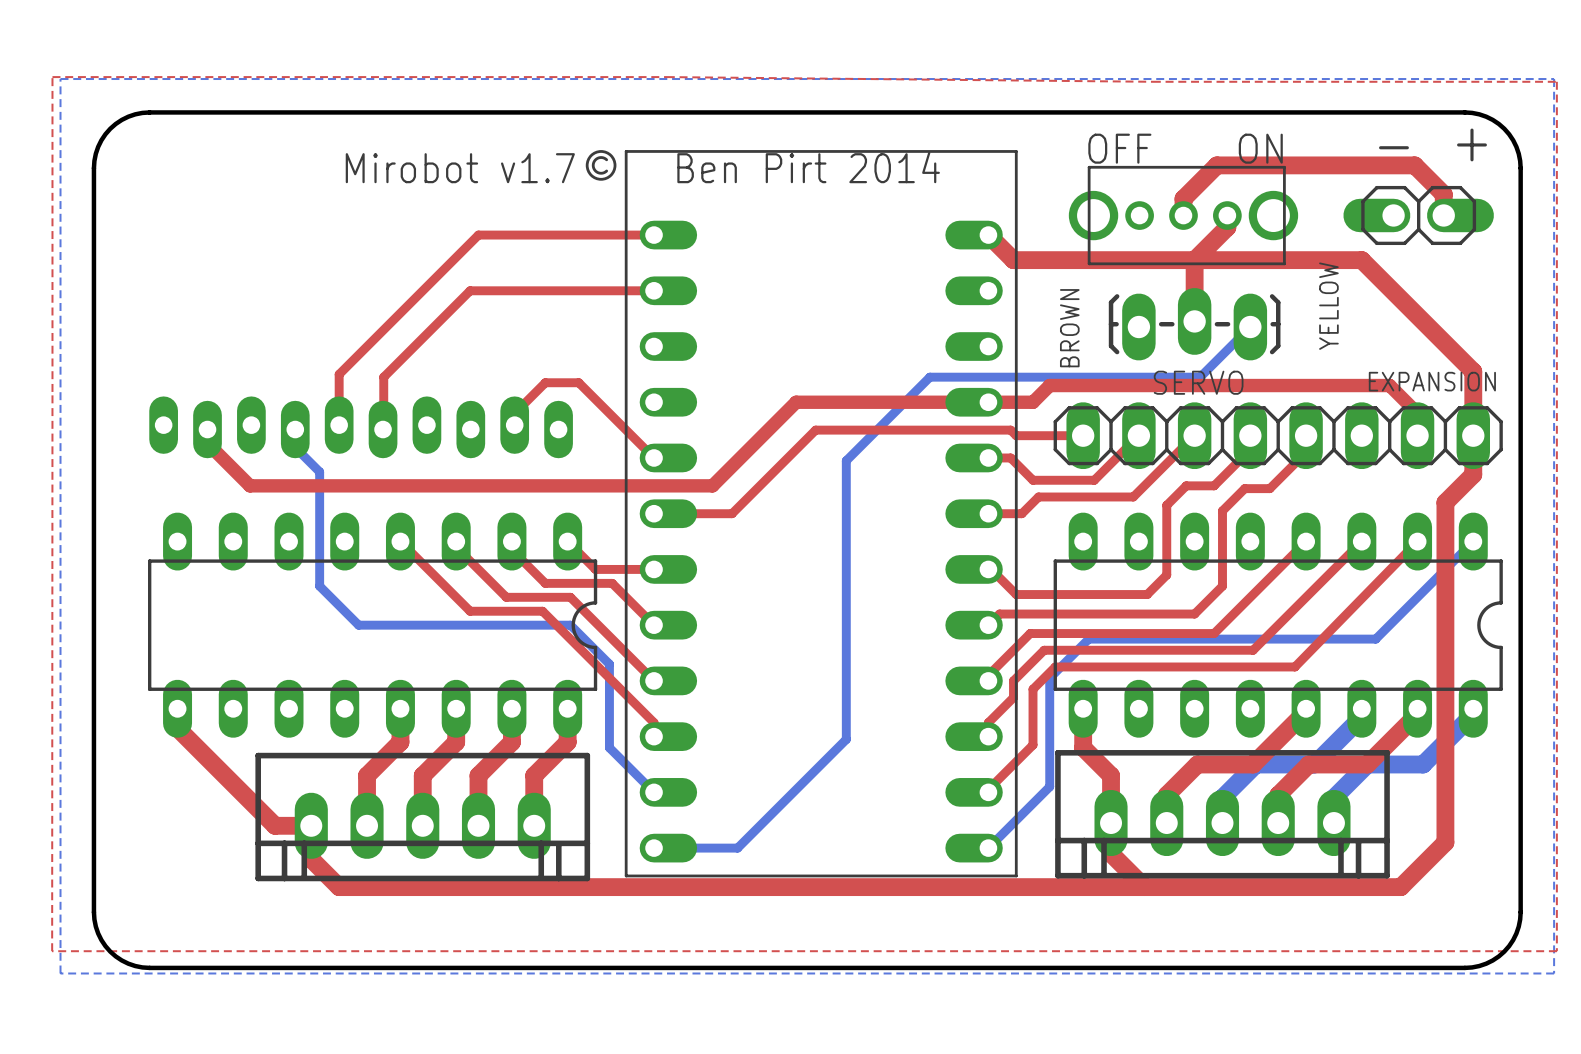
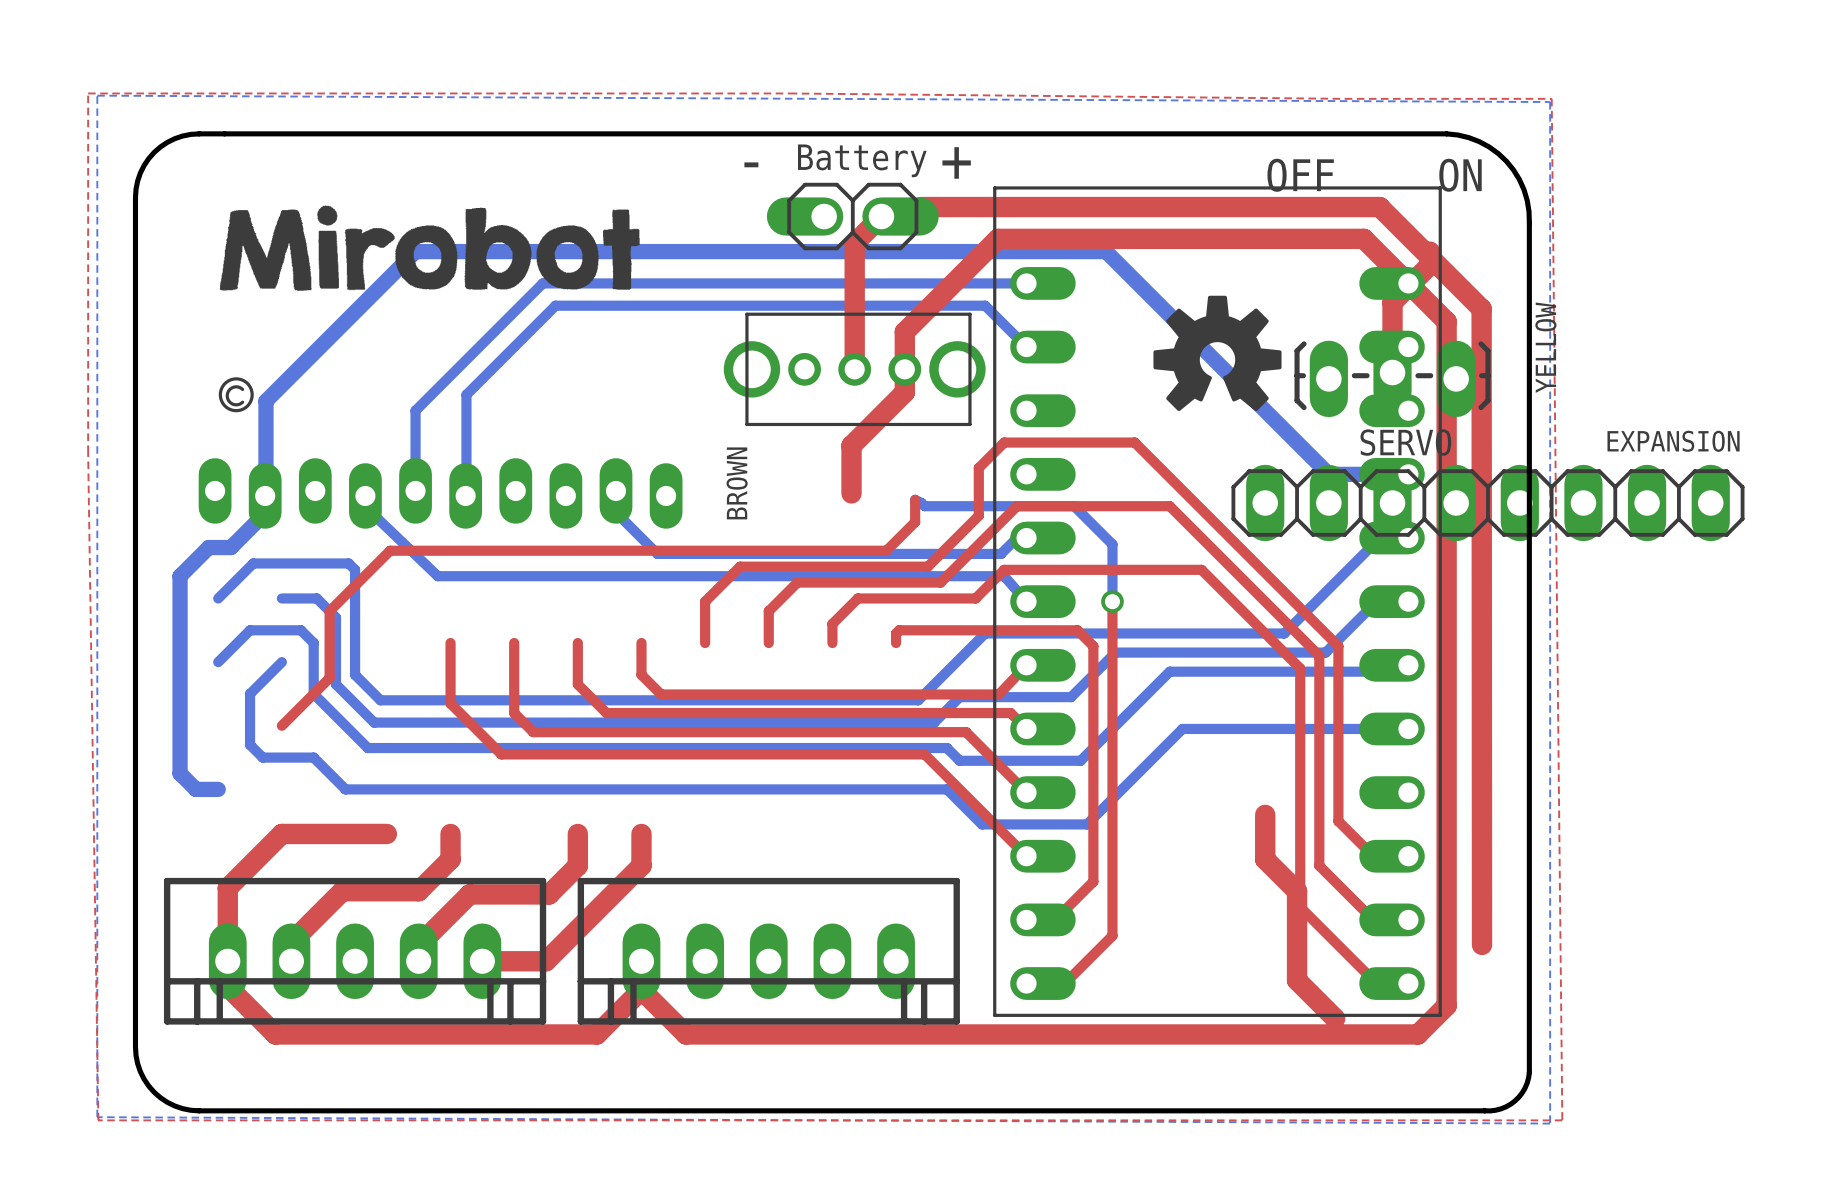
bottom zone outline: (60, 79) (1554, 79) (1554, 973) (60, 973) -> (97, 95) (1550, 102) (1550, 1123) (97, 1117)
top zone outline: (1334, 81) (1556, 81) (1556, 951) (52, 951) (52, 391) -> (1551, 98) (1562, 1120) (98, 1120) (88, 453)
board edge: (1242, 112) (1464, 112) (1479, 114) (1498, 123) (1509, 134) (1518, 153) (1520, 168) (1520, 912) (1518, 926) (1513, 940) (1504, 951) (1486, 963) (1472, 967) (1275, 967) -> (1446, 133) (1479, 141) (1506, 161) (1524, 189) (1529, 211) (1529, 1072) (1524, 1088) (1514, 1100) (1500, 1108) (1484, 1110)
text: none -> - (751, 164)
text: none -> + (956, 162)
text: + (1471, 144) -> none
text: - (1393, 147) -> none
line: (606, 159) (598, 158) (593, 165) (598, 172) (606, 170) -> (242, 389) (232, 387) (227, 395) (232, 404) (242, 402)
drawing position: (601, 165) -> (236, 394)
text: Ben Pirt 2014 (808, 167) -> none
text: Mirobot v1.7 (460, 168) -> none
drawing: none -> [219, 205, 640, 291]
part: none -> Battery (852, 216)
top track: (1183, 215) (1183, 198) (1216, 165) (1414, 165) (1443, 194) (1443, 215) -> none
part position: (1183, 215) -> (854, 369)
part: (1418, 215) -> none
top track: (654, 235) (478, 235) (339, 374) (339, 425) -> none
top track: (988, 235) (1013, 260) (1361, 260) (1473, 371) (1473, 474) (1445, 502) (1445, 842) (1400, 887) (339, 887) (311, 859) (311, 825) (275, 825) (177, 728) (177, 708) -> none
bottom track: none -> (1026, 283) (542, 283) (415, 410) (415, 490)
drawing: none -> [1153, 295, 1282, 412]
top track: (654, 290) (470, 290) (383, 377) (383, 429) -> none
bottom track: none -> (1026, 347) (985, 305) (555, 305) (466, 394) (465, 495)
top track: none -> (854, 369) (854, 243) (881, 216) (918, 216) (921, 207) (1379, 207) (1481, 308) (1482, 944)
bottom track: (1250, 327) (1200, 377) (929, 377) (846, 460) (846, 739) (737, 848) (654, 848) -> none
text position: BROWN (1069, 328) -> BROWN (737, 483)
bottom track: none -> (1408, 474) (1328, 474) (1106, 251) (415, 251) (265, 401) (265, 513) (230, 547) (208, 547) (180, 576) (180, 773) (195, 789) (218, 789)
bottom track: none -> (616, 490) (616, 512) (657, 553) (1001, 553) (1020, 534) (1026, 534) (1026, 538)
top track: (514, 425) (514, 413) (545, 382) (578, 382) (654, 457) -> none
top track: none -> (851, 493) (851, 445) (904, 392) (904, 331) (997, 238) (1363, 238) (1446, 321) (1446, 1005) (1417, 1034) (686, 1034) (641, 989)
top track: (207, 429) (208, 444) (249, 485) (712, 485) (796, 402) (1033, 402) (1049, 385) (1389, 385) (1417, 413) (1417, 435) -> none
bottom track: (295, 429) (294, 446) (319, 471) (319, 586) (358, 625) (570, 625) (609, 664) (609, 747) (654, 792) -> (365, 495) (365, 506) (437, 576) (1004, 576) (1026, 601)
bottom track: none -> (915, 499) (924, 506) (1074, 506) (1112, 544) (1112, 601)
top track: none -> (915, 499) (915, 522) (886, 550) (390, 550) (329, 611) (329, 678) (281, 725)
top track: (1083, 435) (1016, 435) (1010, 430) (815, 430) (732, 513) (654, 513) -> none
top track: (1138, 435) (1094, 480) (1033, 480) (1010, 457) (988, 457) -> none
top track: (1194, 435) (1133, 496) (1038, 496) (1021, 513) (988, 513) -> none
top track: (1250, 435) (1250, 449) (1214, 485) (1186, 485) (1166, 505) (1166, 575) (1147, 594) (1016, 594) (991, 569) (988, 569) -> none
top track: (1306, 435) (1306, 452) (1269, 488) (1244, 488) (1222, 510) (1222, 586) (1194, 614) (999, 614) (988, 625) -> none
bottom track: none -> (1408, 538) (1379, 538) (1284, 633) (985, 633) (918, 700) (380, 700) (355, 674) (355, 569) (348, 563) (253, 563) (218, 598)
part position: (821, 513) -> (1217, 601)
bottom track: none -> (281, 598) (316, 598) (335, 617) (335, 684) (374, 722) (934, 722) (959, 697) (1071, 697) (1115, 652) (1325, 652) (1376, 601) (1408, 601)
top track: none -> (1112, 601) (1112, 935) (1064, 983) (1026, 983)
via: none -> (1112, 601)
top track: (400, 541) (470, 611) (542, 611) (654, 722) (654, 736) -> none
top track: (456, 541) (456, 547) (506, 597) (570, 597) (654, 680) -> none
top track: (511, 541) (511, 549) (545, 583) (612, 583) (654, 625) -> none
top track: (567, 541) (595, 569) (654, 569) -> none
top track: (1306, 541) (1214, 633) (1030, 633) (988, 675) (988, 680) -> none
top track: (1361, 541) (1253, 650) (1044, 650) (1013, 680) (1013, 697) (988, 722) (988, 736) -> none
top track: (1417, 541) (1294, 666) (1055, 666) (1033, 689) (1033, 744) (988, 789) (988, 792) -> none
bottom track: (1473, 541) (1375, 639) (1088, 639) (1049, 678) (1049, 786) (988, 848) -> none
top track: none -> (450, 643) (450, 703) (501, 754) (924, 754) (1026, 856)
top track: none -> (514, 643) (514, 713) (533, 732) (966, 732) (1026, 792)
top track: none -> (577, 643) (577, 684) (606, 713) (1010, 713) (1026, 728)
top track: none -> (641, 643) (641, 674) (661, 694) (998, 694) (1026, 665)
top track: none -> (705, 643) (705, 601) (740, 566) (927, 566) (978, 515) (978, 468) (1004, 442) (1134, 442) (1338, 646) (1338, 821) (1373, 856) (1408, 856)
top track: none -> (768, 643) (768, 611) (797, 582) (940, 582) (1017, 506) (1169, 506) (1319, 655) (1319, 865) (1373, 919) (1408, 919)
top track: none -> (832, 643) (832, 623) (857, 598) (975, 598) (1004, 569) (1201, 569) (1300, 668) (1300, 907) (1376, 983) (1408, 983)
top track: none -> (896, 643) (896, 633) (899, 630) (1077, 630) (1093, 646) (1093, 881) (1055, 919) (1026, 919)
bottom track: none -> (218, 662) (250, 630) (300, 630) (313, 643) (313, 693) (367, 748) (946, 748) (959, 760) (1080, 760) (1169, 671) (1389, 671) (1408, 665)
bottom track: none -> (281, 662) (250, 693) (250, 744) (262, 757) (313, 757) (345, 789) (946, 789) (981, 824) (1087, 824) (1182, 728) (1408, 728)
part: (372, 625) -> none
part: (1278, 625) -> none
top track: (400, 708) (400, 742) (367, 775) (367, 825) -> none
top track: (456, 708) (456, 742) (422, 775) (422, 825) -> none
top track: (511, 708) (511, 742) (478, 775) (478, 825) -> none
top track: (567, 708) (567, 742) (534, 775) (534, 825) -> none
top track: (1306, 708) (1306, 711) (1253, 764) (1197, 764) (1166, 795) (1166, 823) -> none
bottom track: (1361, 708) (1361, 717) (1314, 764) (1255, 764) (1222, 797) (1222, 823) -> none
top track: (1417, 708) (1417, 714) (1367, 764) (1308, 764) (1278, 795) (1278, 823) -> none
bottom track: (1473, 708) (1473, 714) (1423, 764) (1367, 764) (1333, 797) (1333, 823) -> none
top track: none -> (386, 833) (281, 833) (227, 888) (227, 986) (275, 1034) (596, 1034) (641, 989)
top track: none -> (450, 833) (450, 859) (418, 891) (342, 891) (291, 942) (291, 961)
top track: none -> (577, 833) (577, 865) (549, 894) (469, 894) (418, 945) (418, 961)
top track: none -> (641, 833) (641, 865) (546, 961) (482, 961)
part: (1222, 814) -> none
part: (422, 817) -> none
part: none -> (355, 951)
part: none -> (768, 951)

